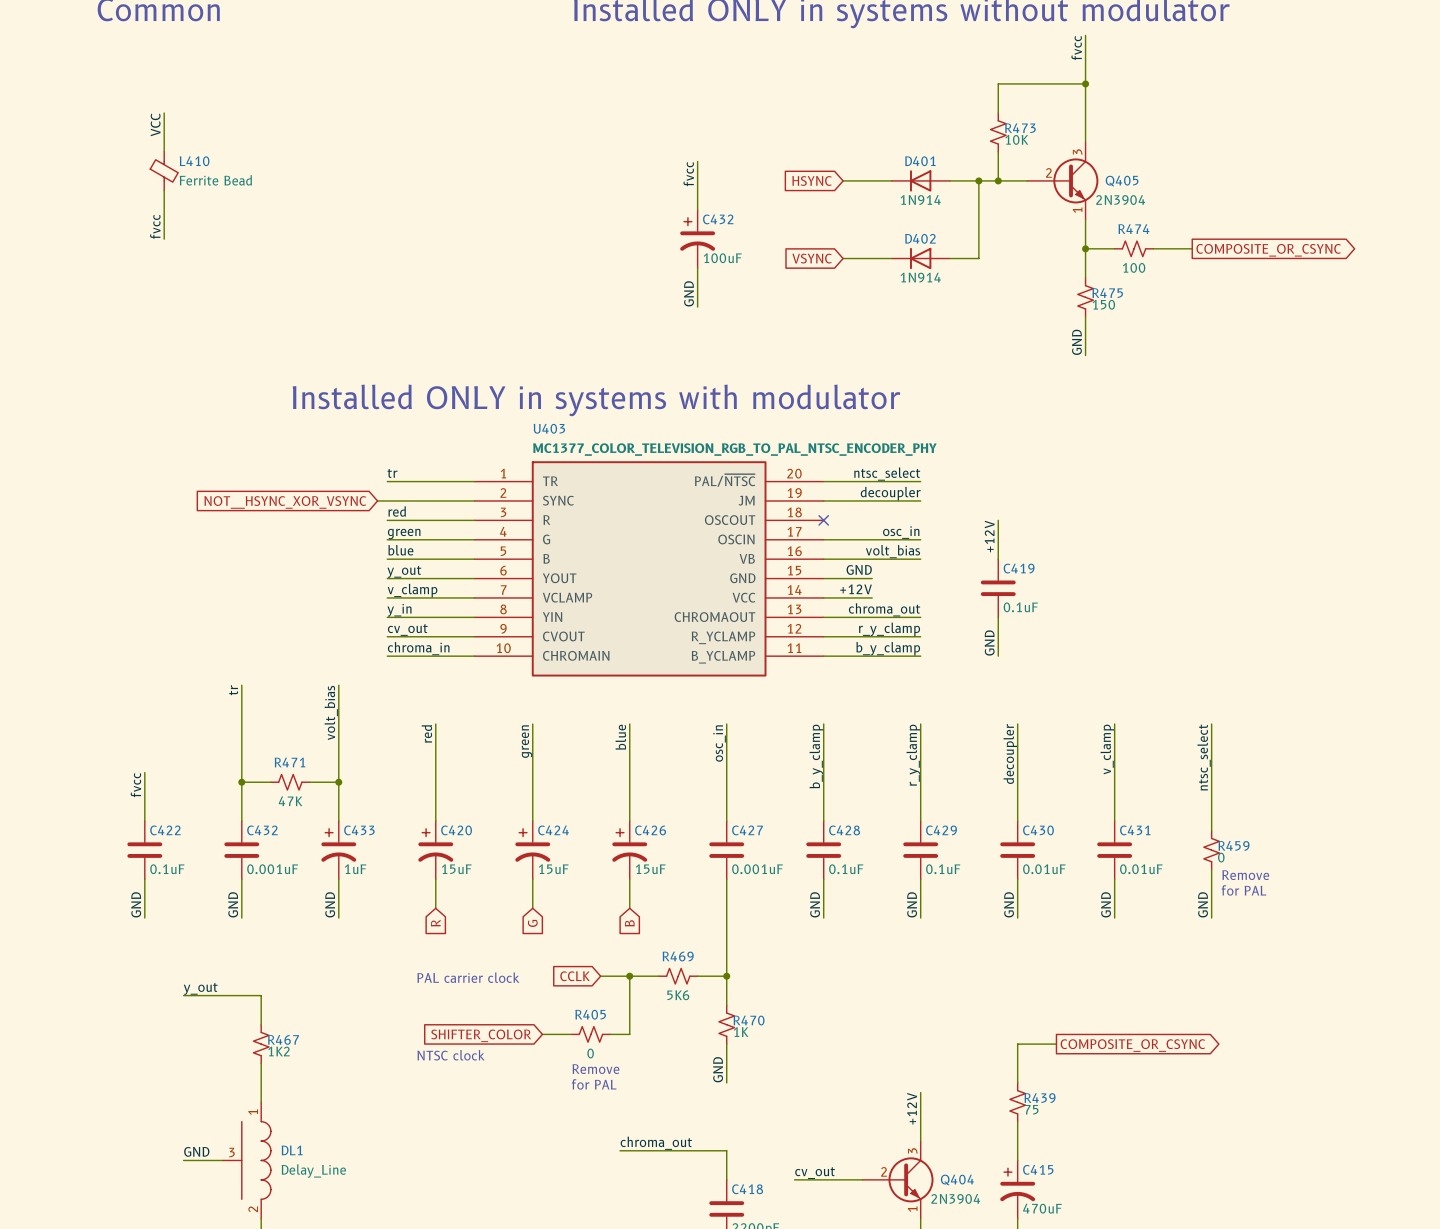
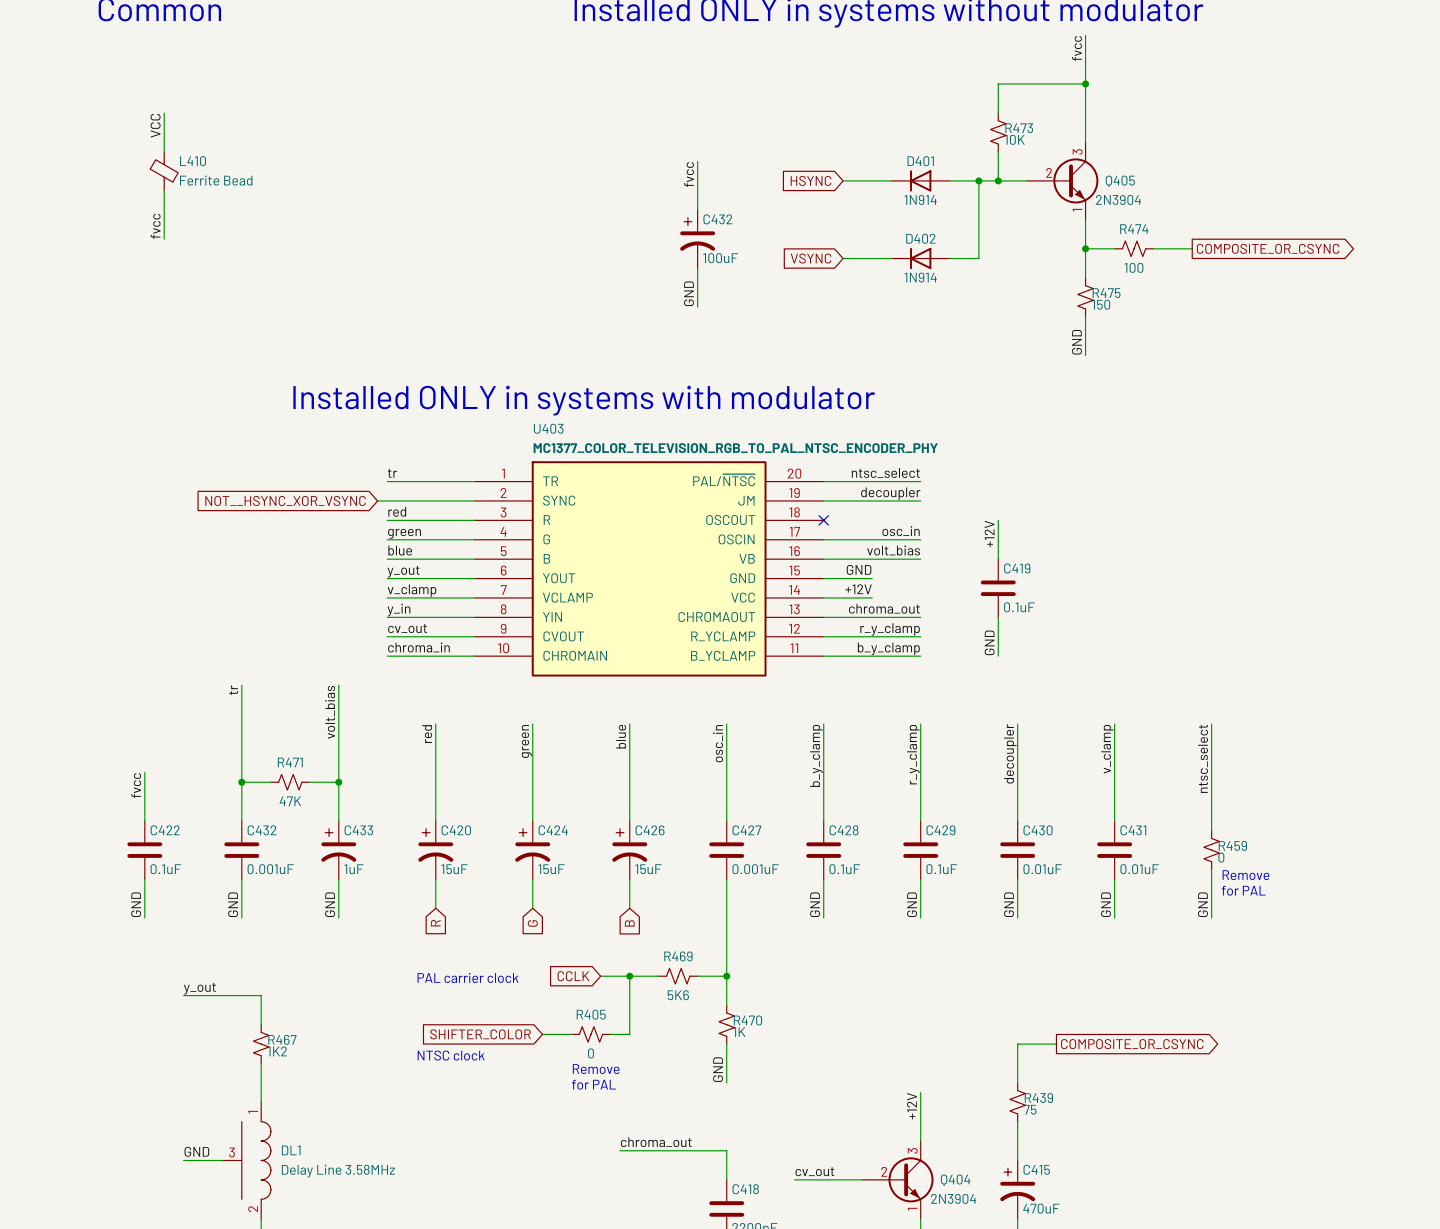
DL1 value: Delay_Line (313, 1171) -> Delay Line 3.58MHz (338, 1171)

